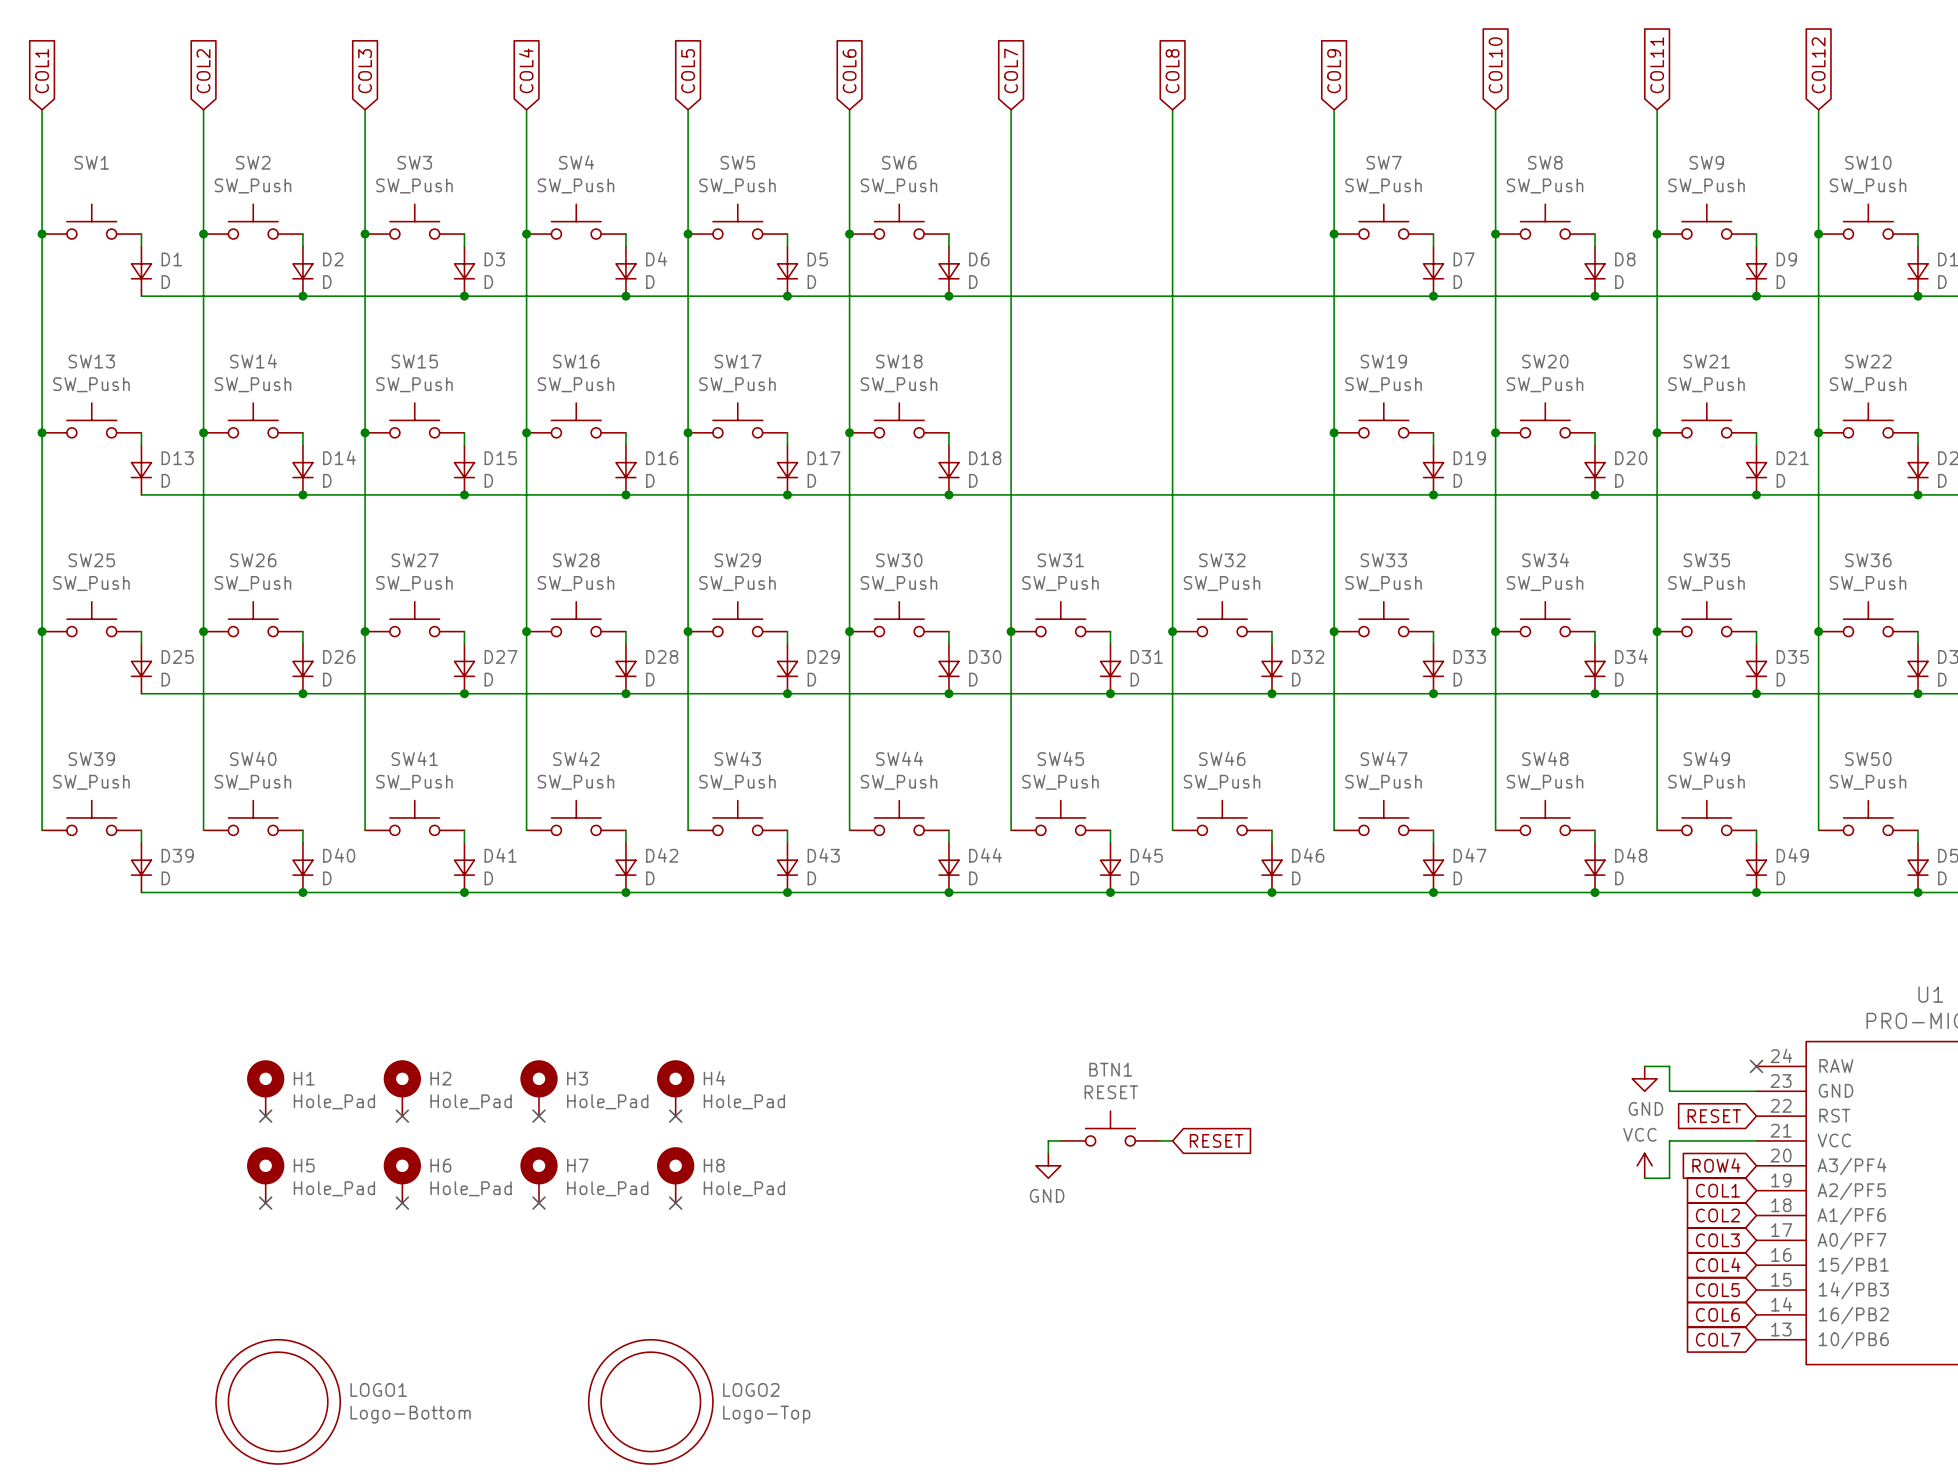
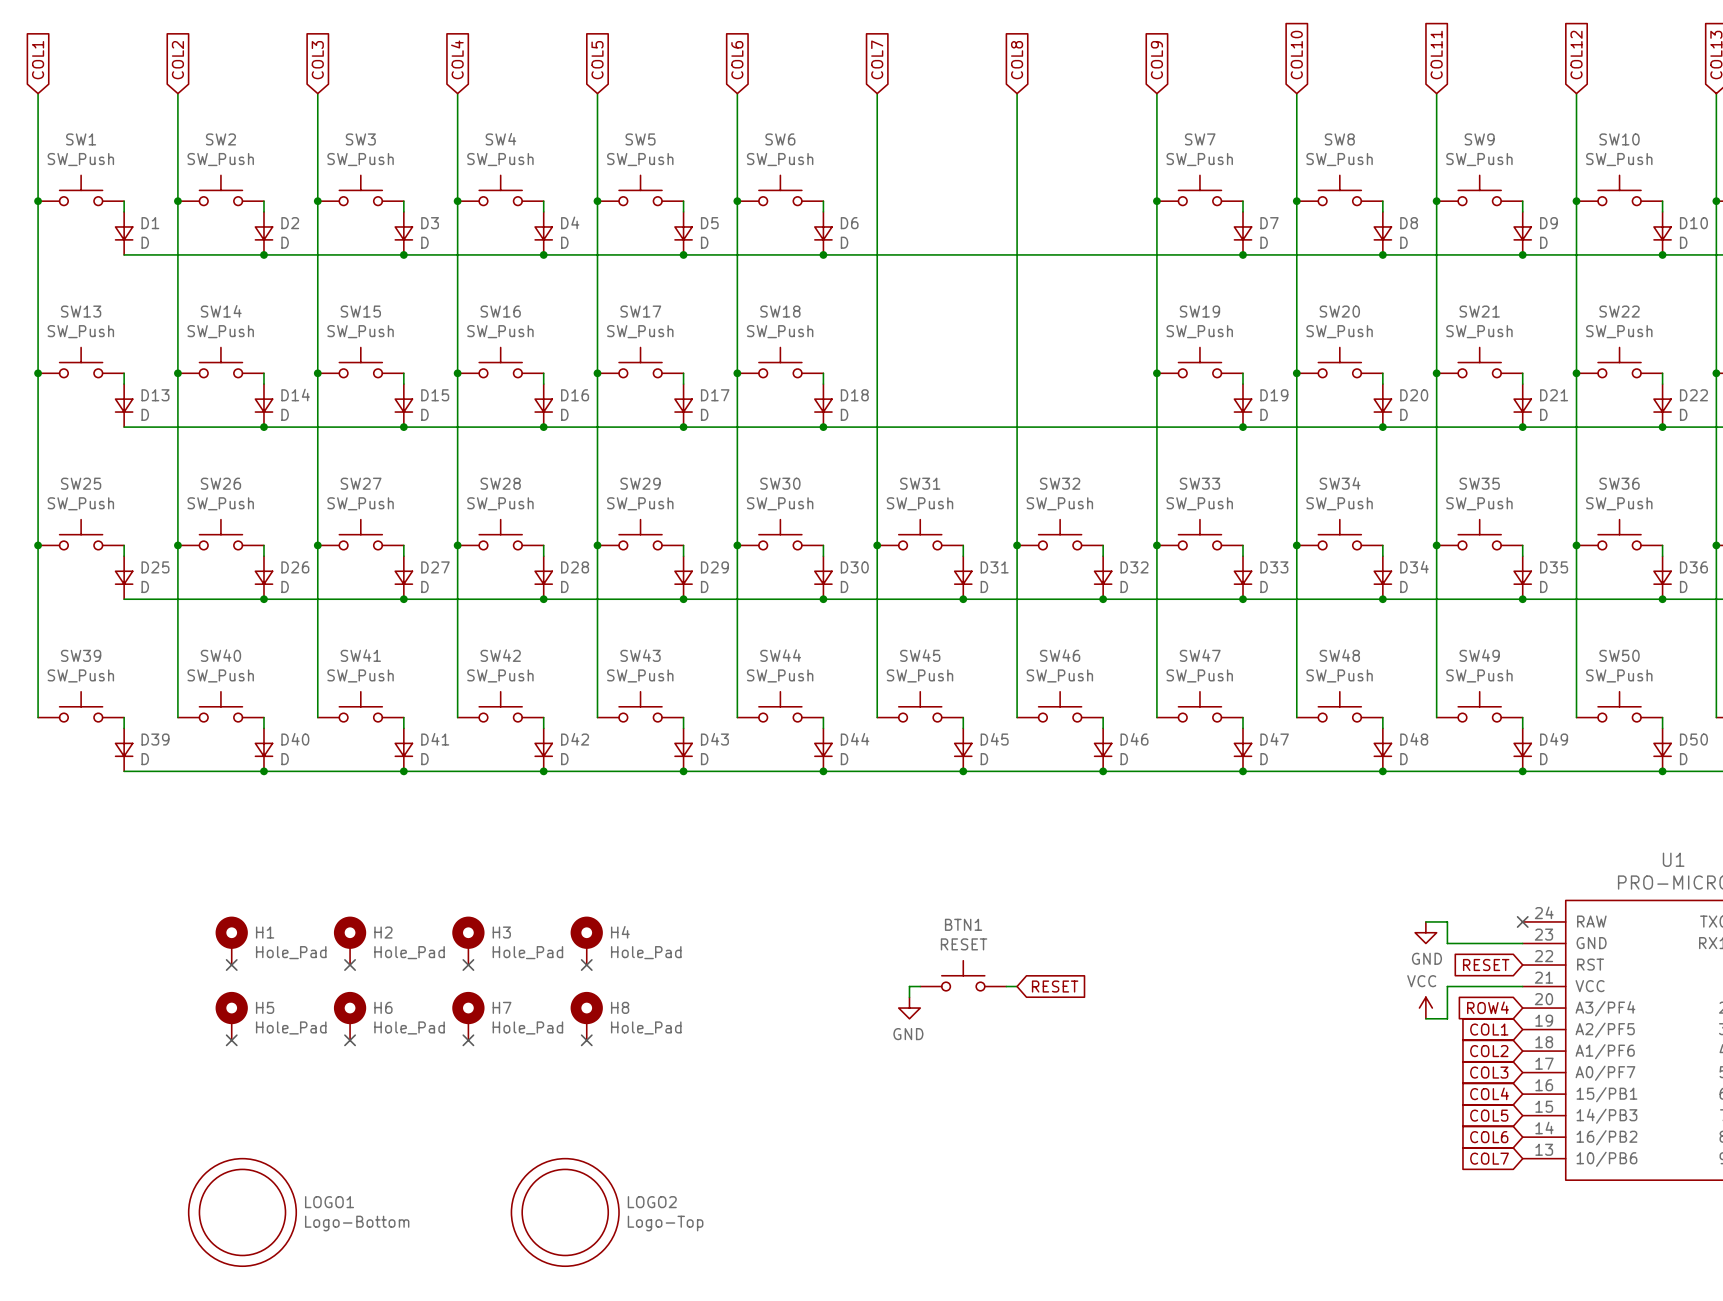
SW1 value: none -> SW_Push (80, 159)

